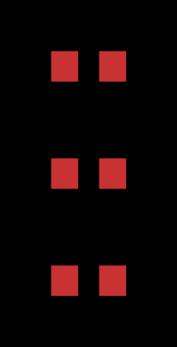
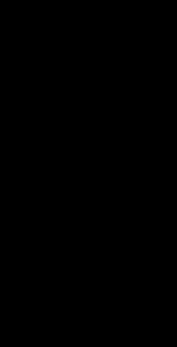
part: (88, 66) -> none
part: (88, 173) -> none
part: (88, 280) -> none

